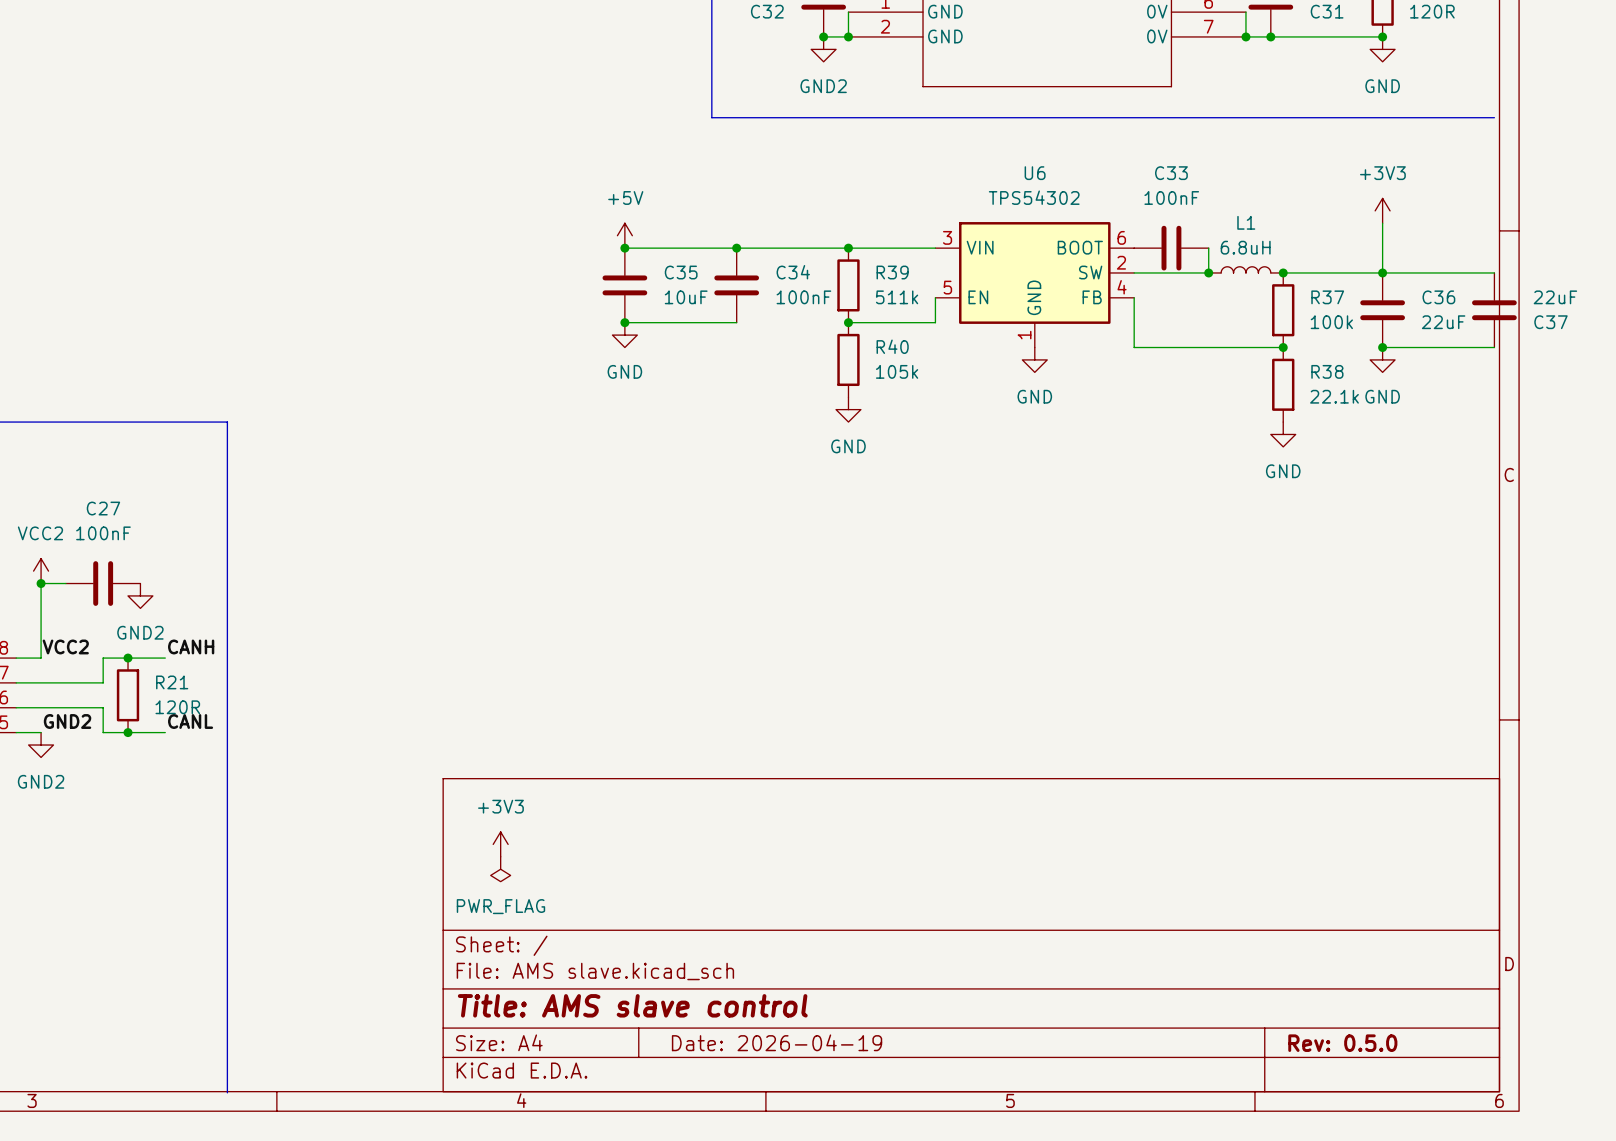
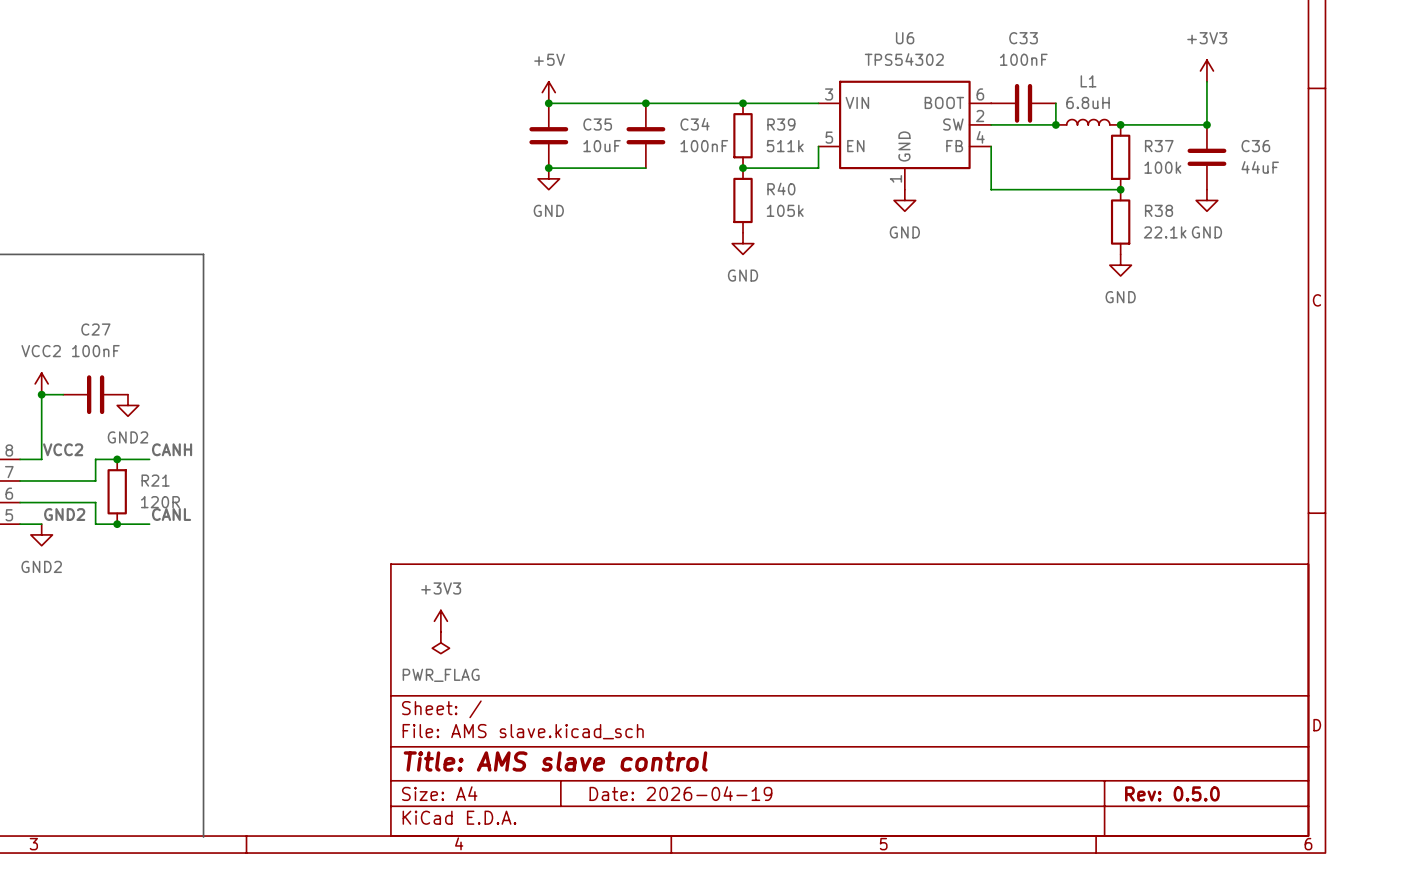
wire: (1382, 272) (1494, 272) -> none
C37: 22uF (1494, 310) -> none
C36 value: 22uF (1443, 322) -> 44uF (1260, 167)
wire: (1382, 347) (1494, 347) -> none
junction: (1382, 347) -> none

